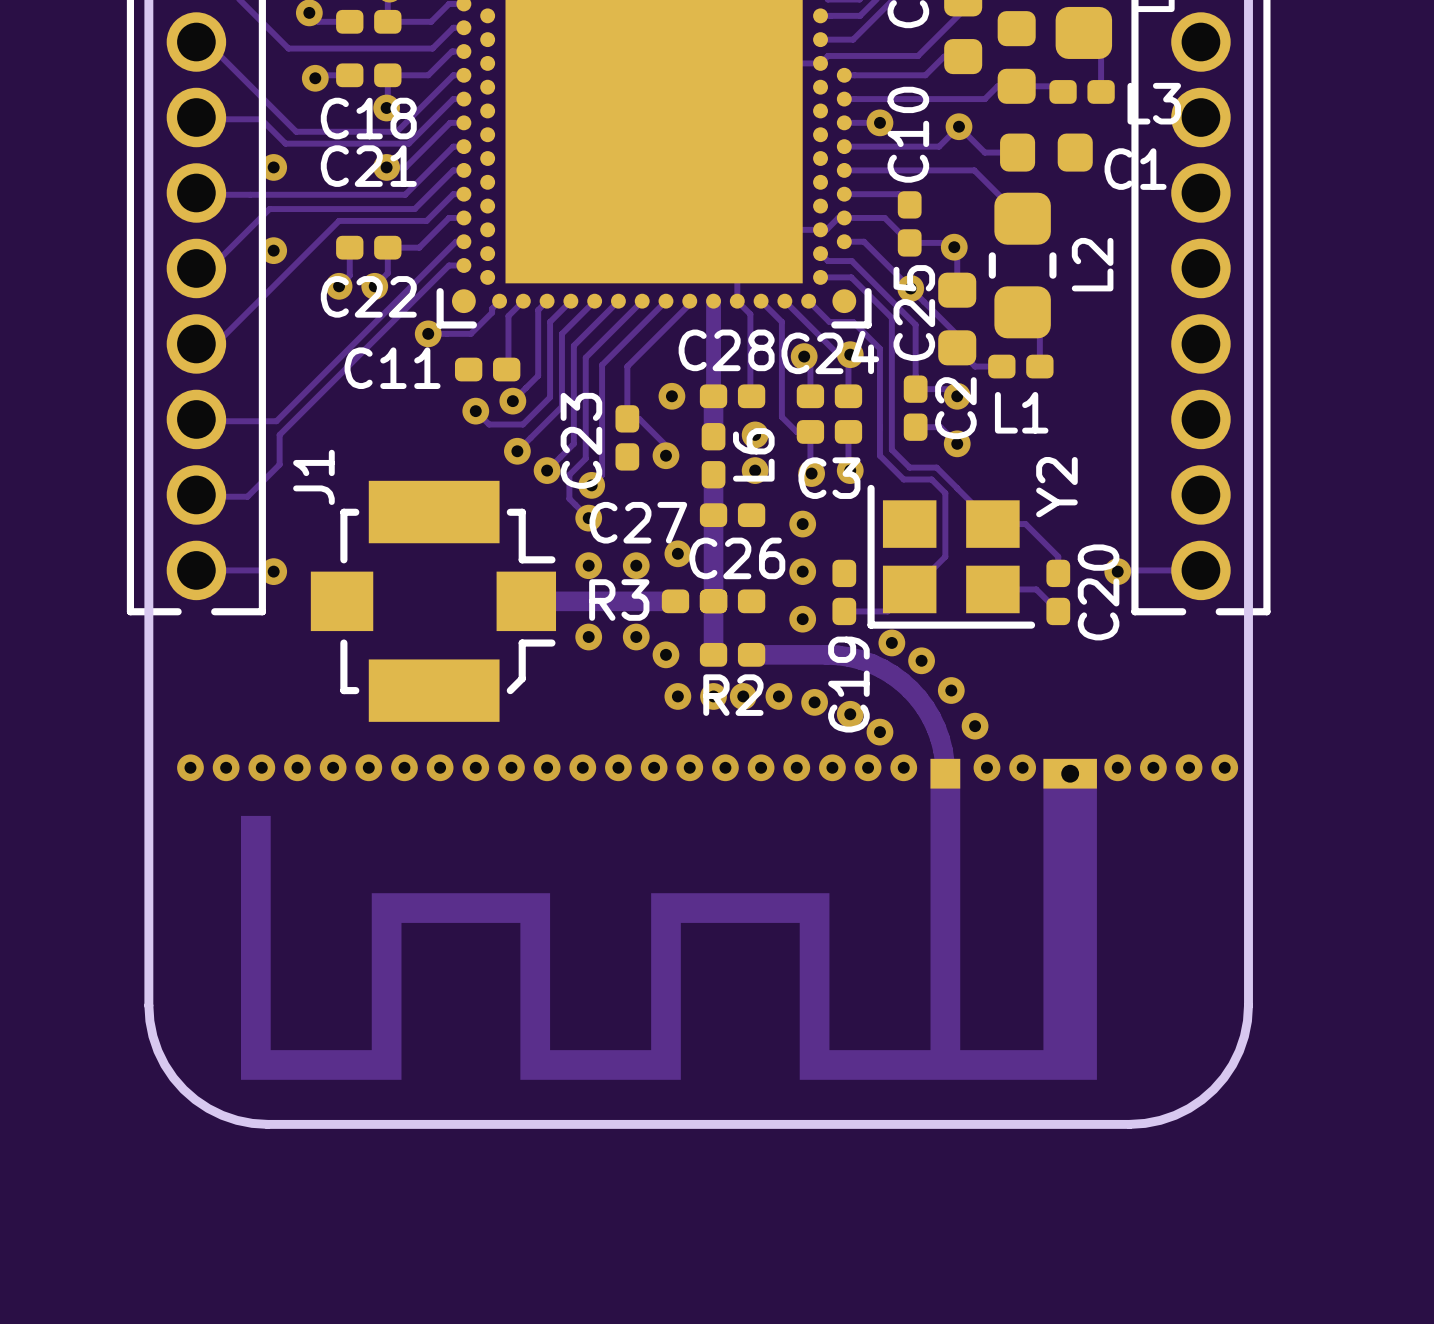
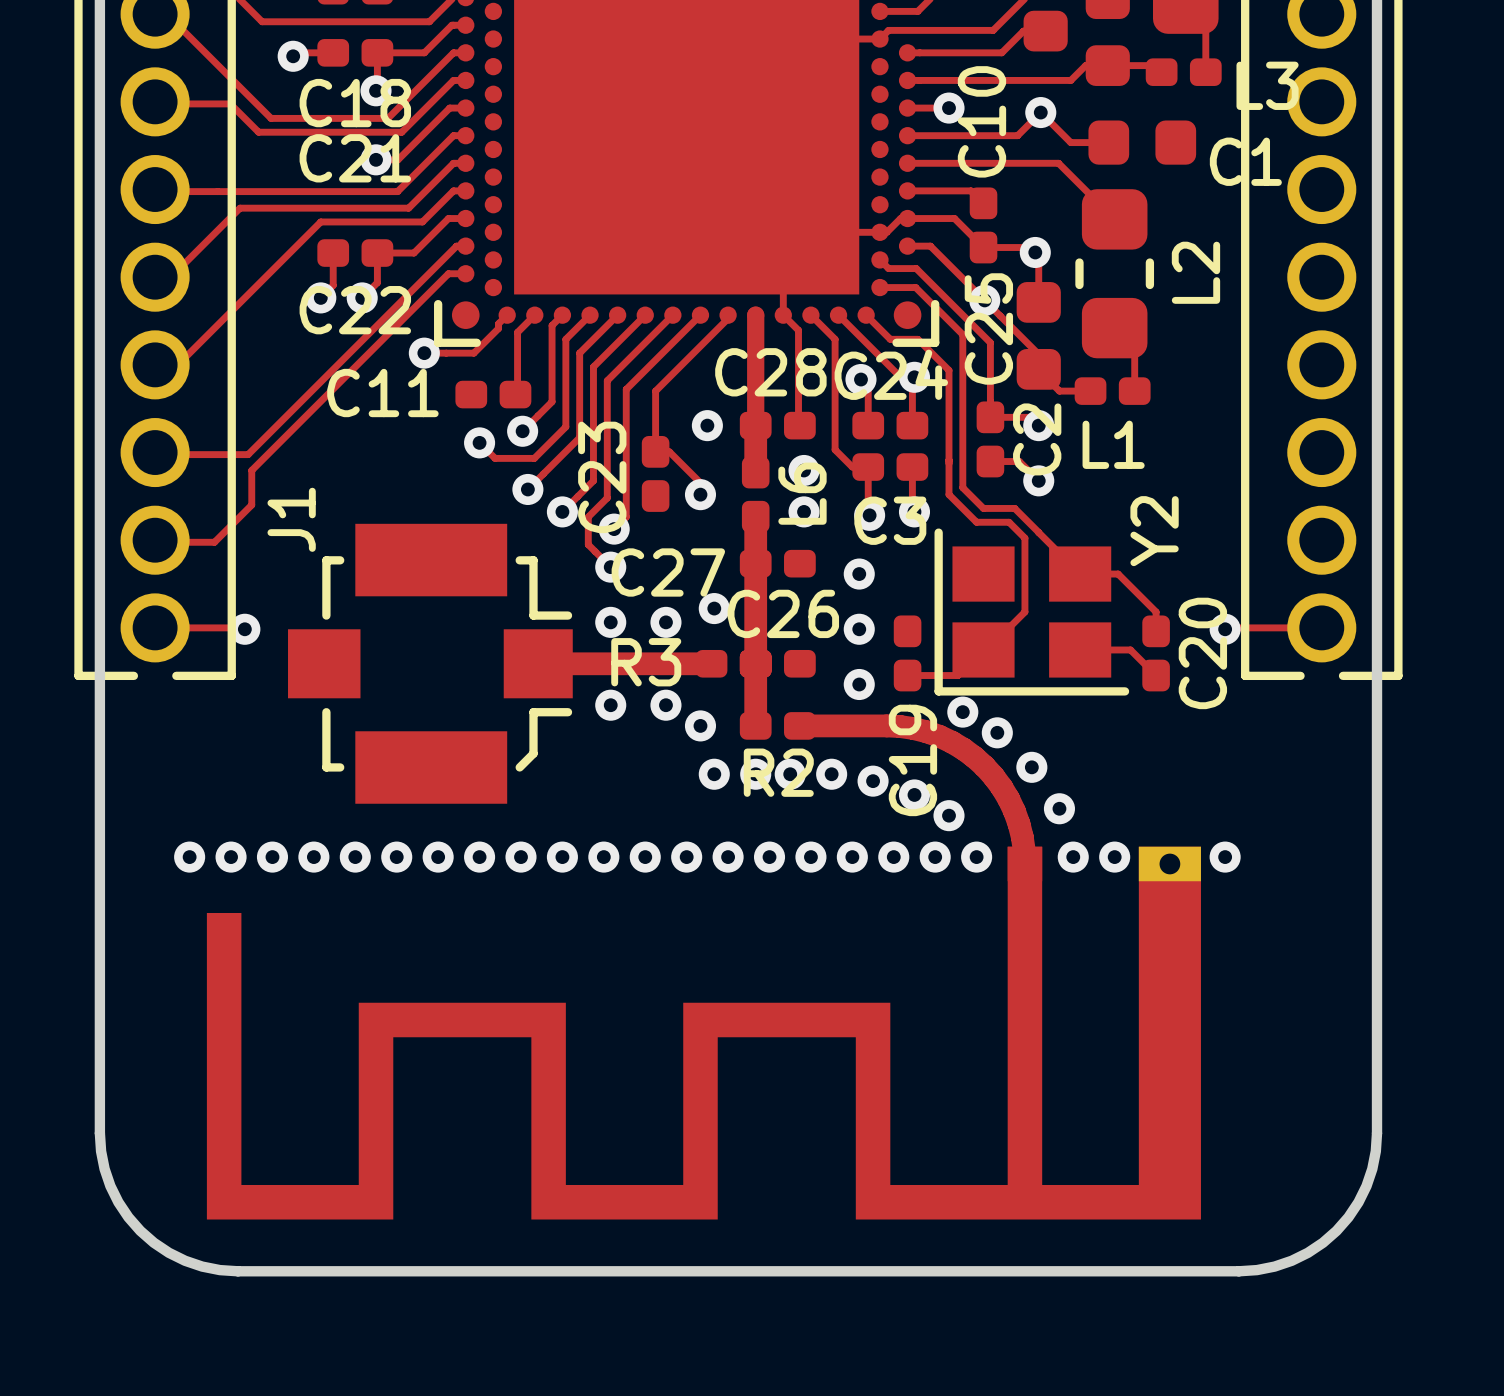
via: (273, 167) -> none
via: (273, 250) -> none
via: (190, 767) -> none
via: (1153, 767) -> none
via: (1189, 767) -> none
via: (1224, 767) -> none

